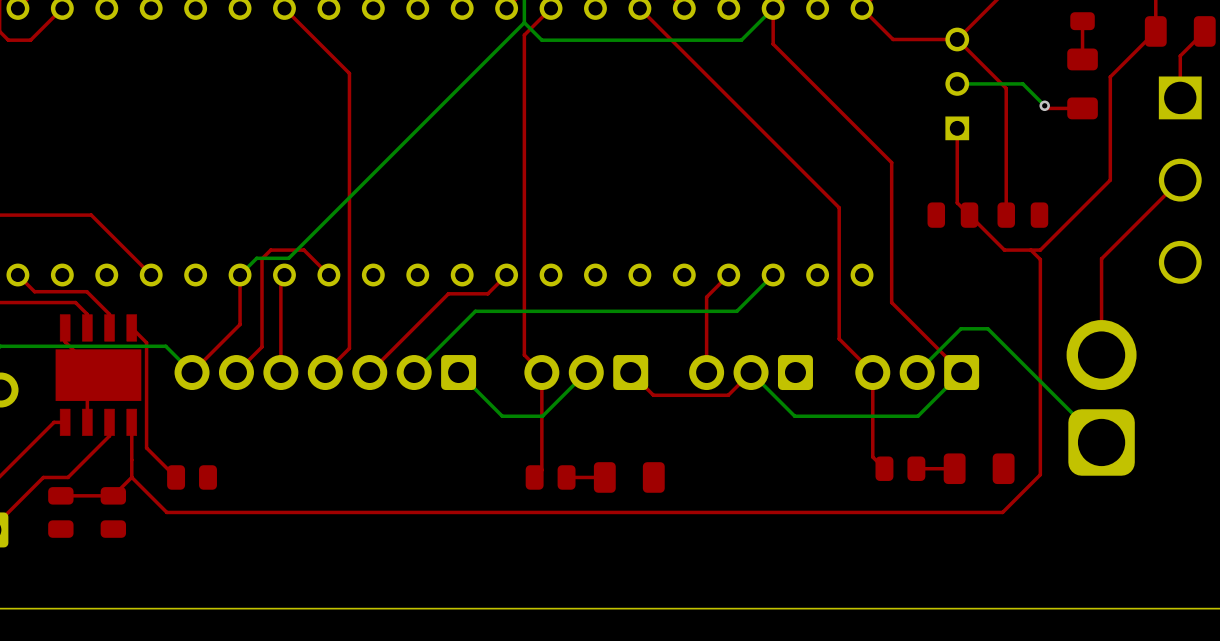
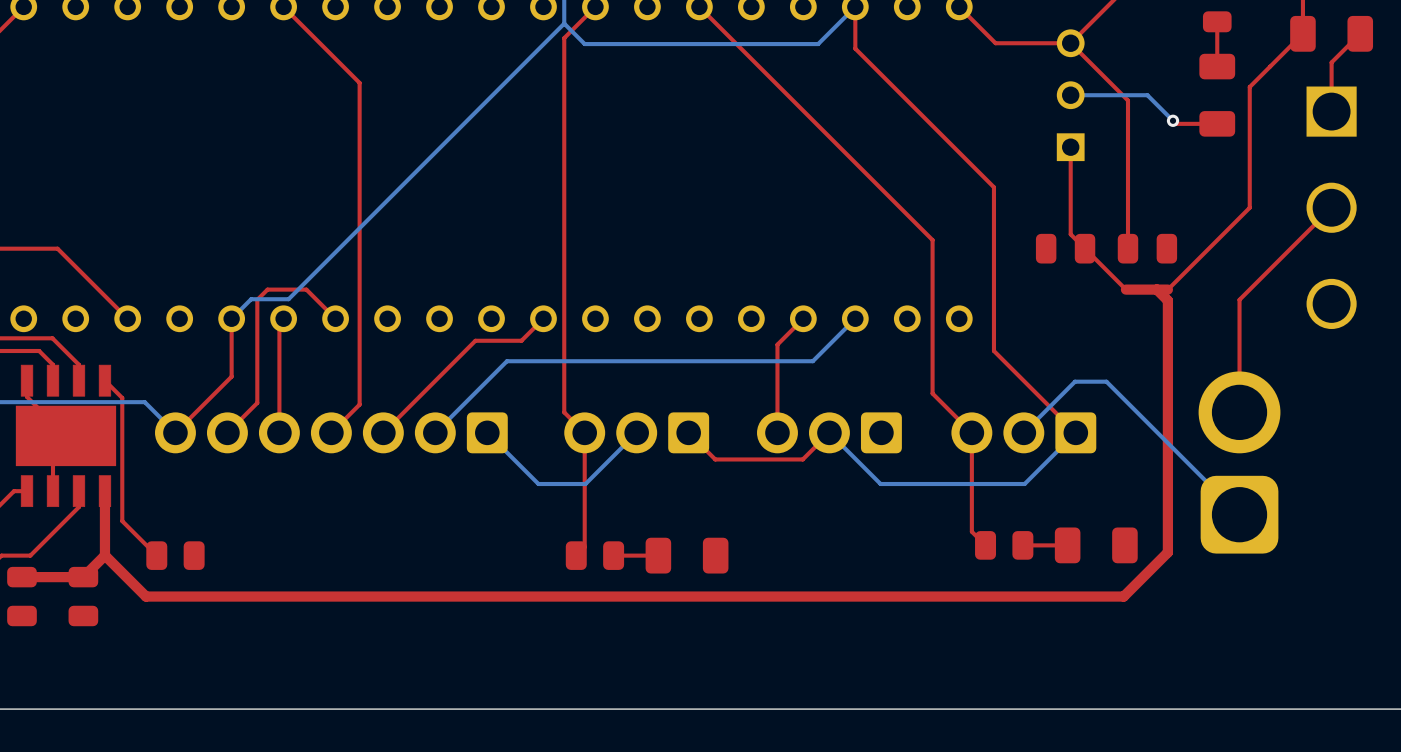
top track width: thin (1030, 250) (1040, 259) (1040, 474) (1002, 512) (166, 512) (131, 477) -> thick (1156, 289) (1167, 300) (1167, 552) (1123, 596) (146, 596) (104, 555)
top track width: thin (1040, 250) (1004, 250) -> thick (1167, 289) (1125, 289)
top track width: thin (131, 422) (131, 477) -> thick (104, 491) (104, 555)
top track width: thin (131, 477) (113, 495) (60, 495) -> thick (104, 555) (83, 577) (21, 577)

